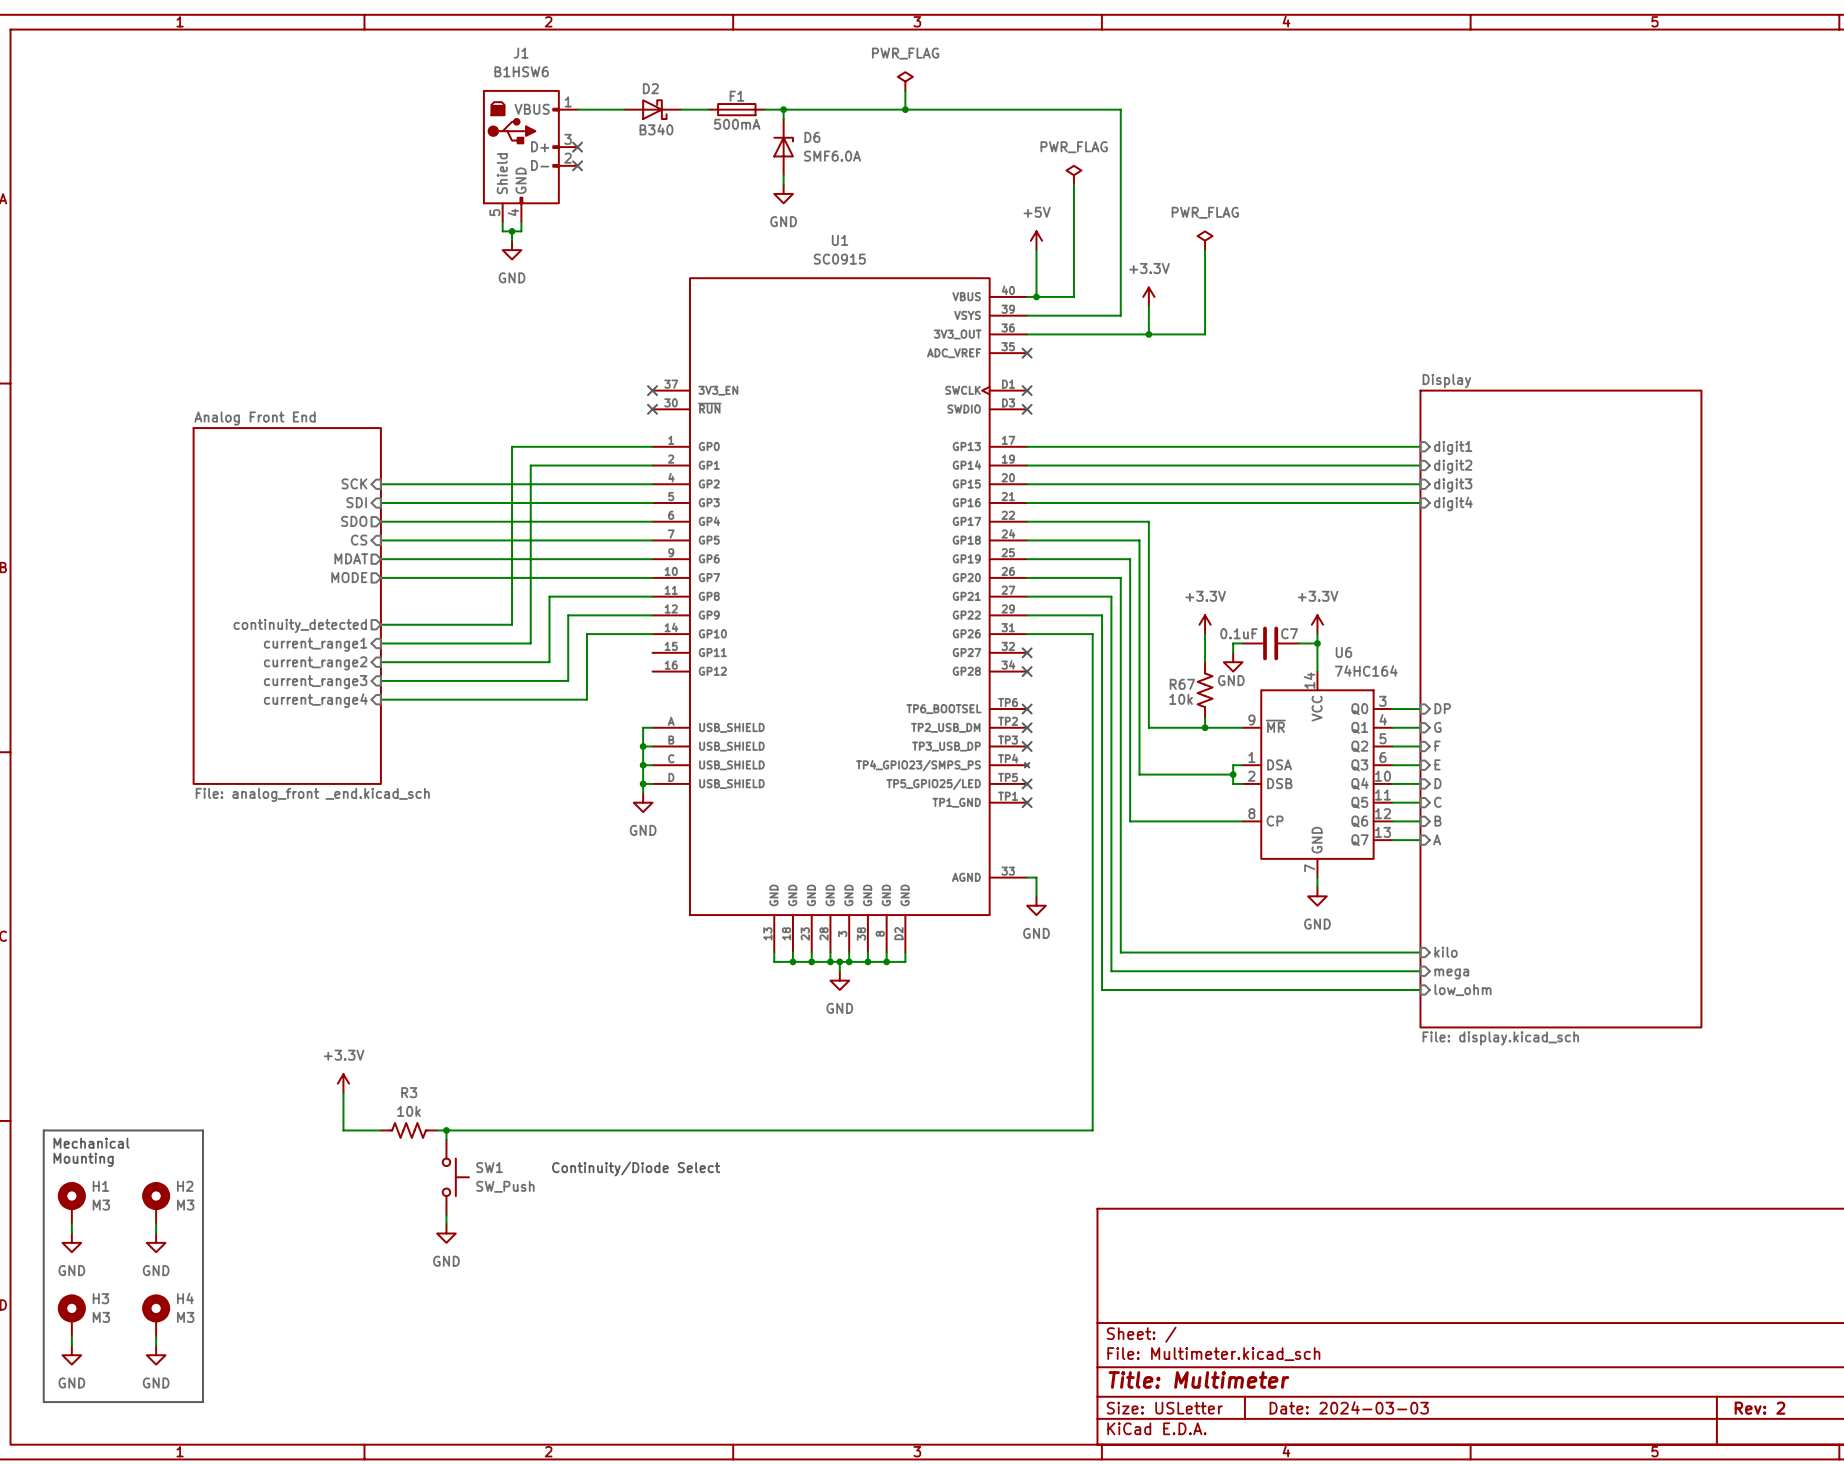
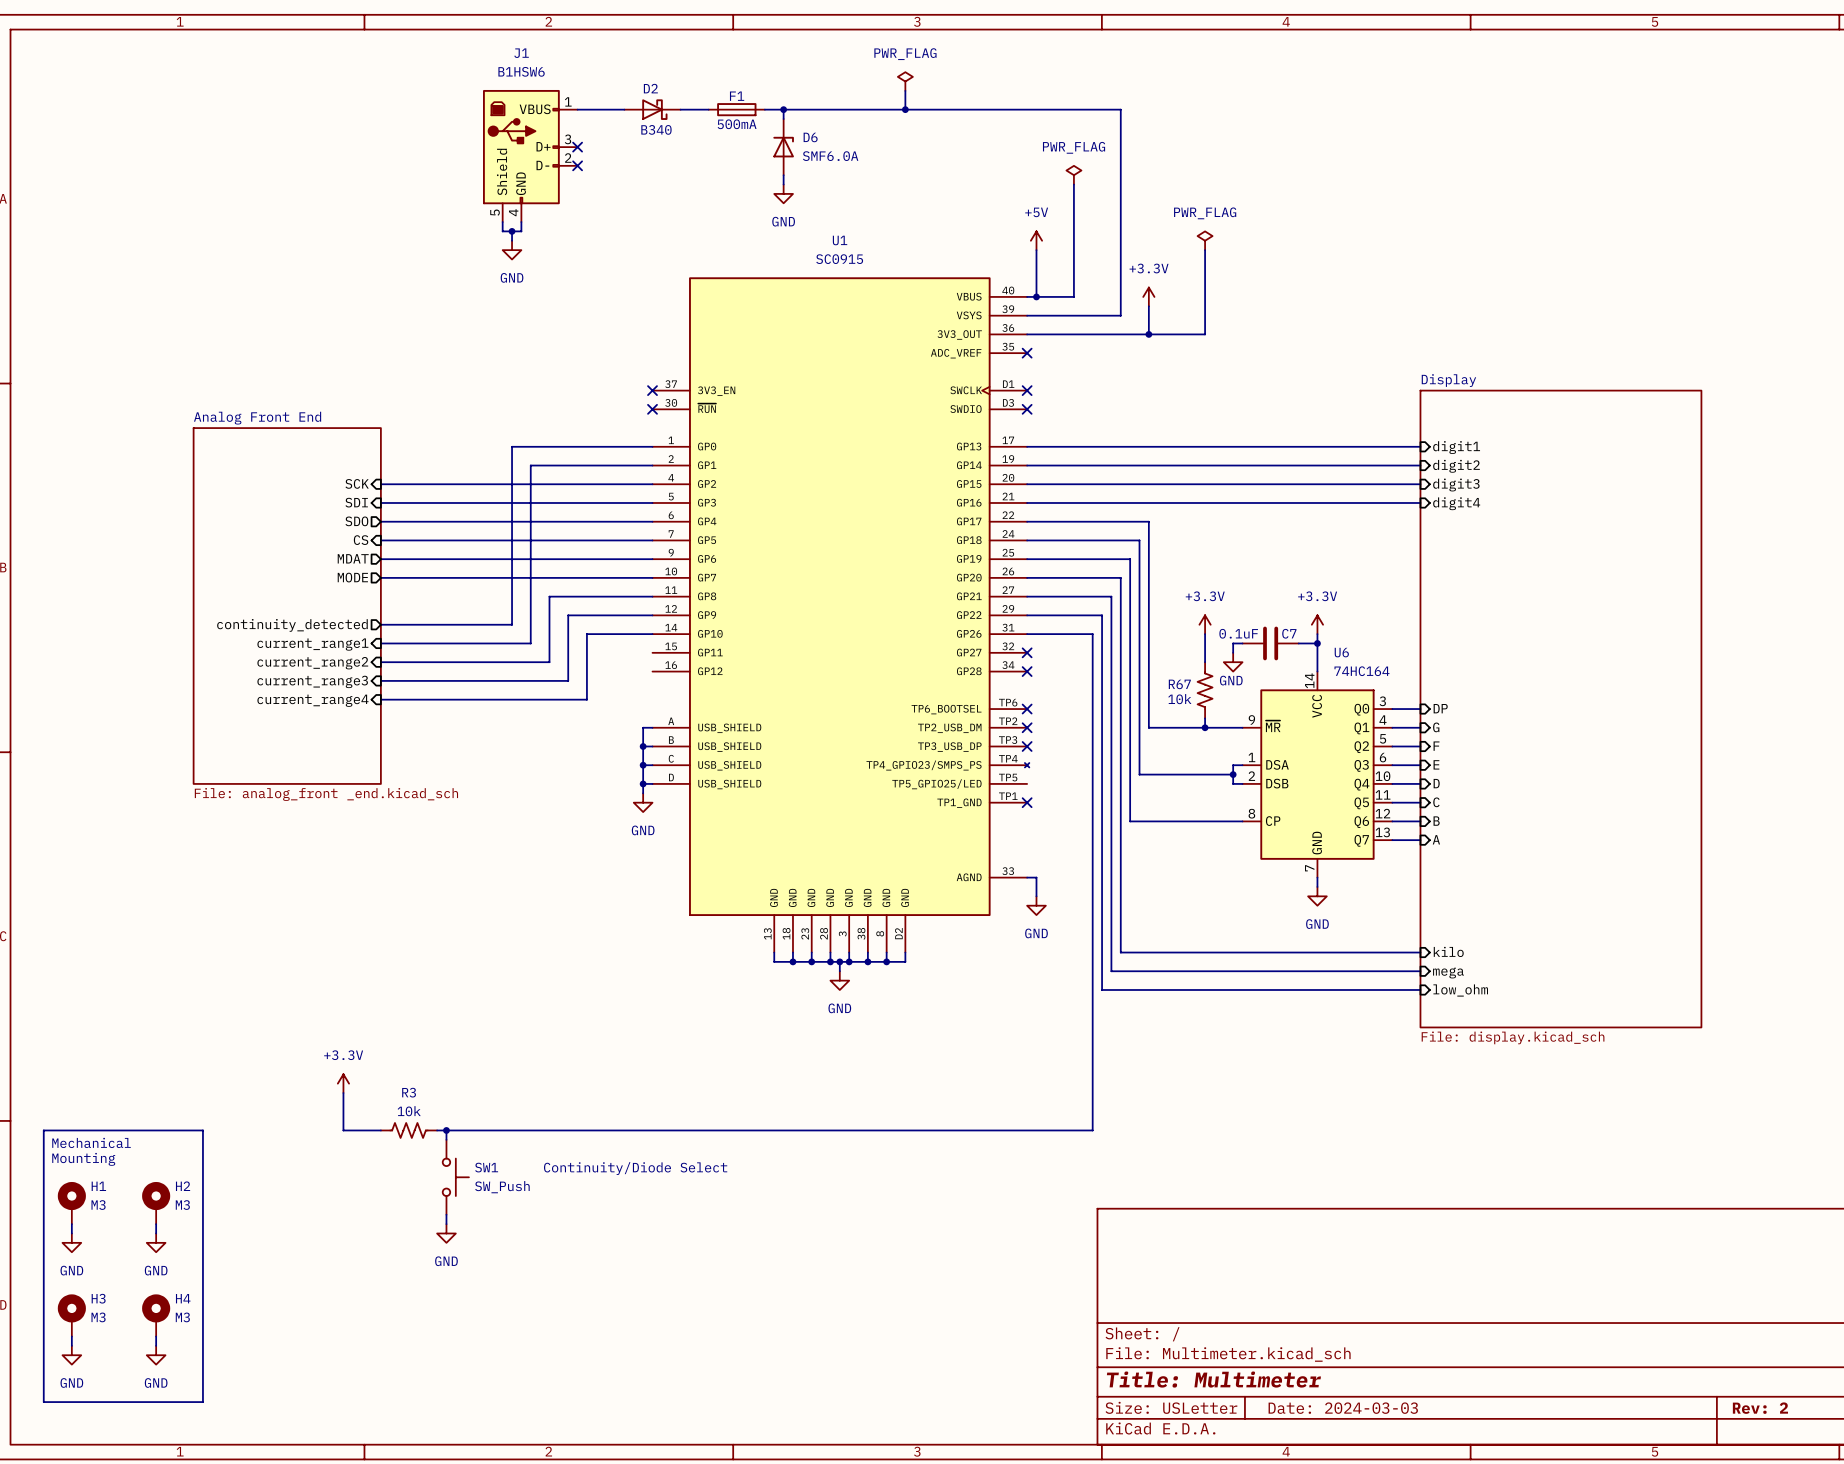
no-connect mark: (1027, 783) -> none

